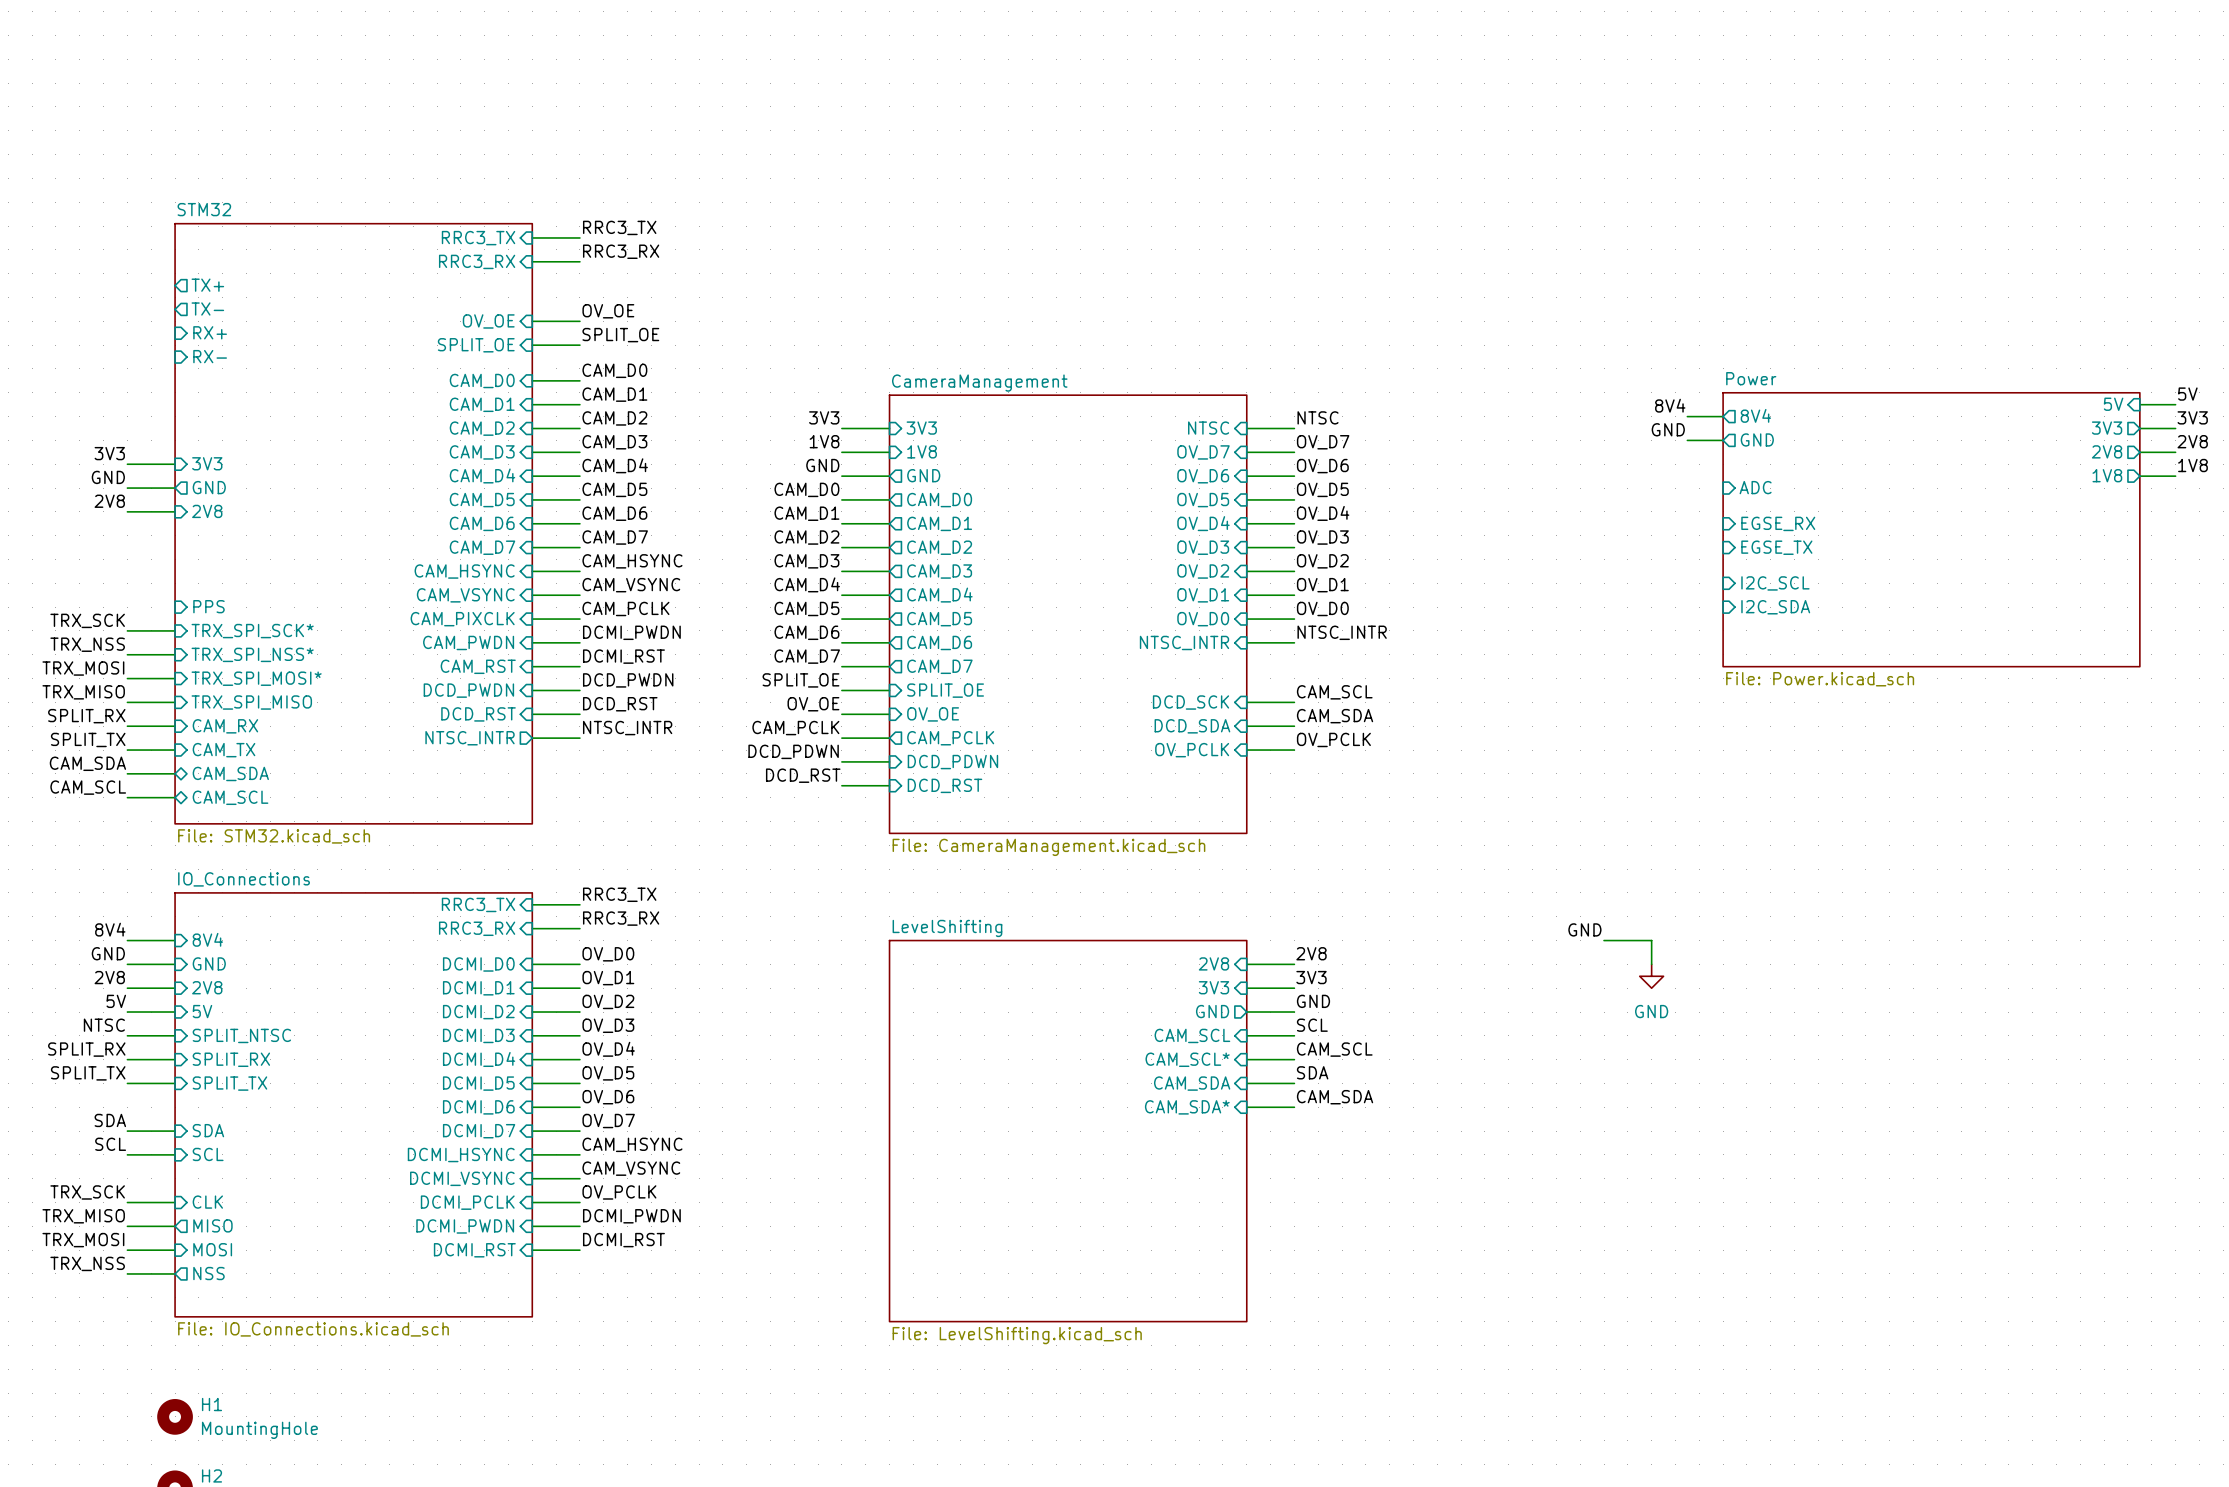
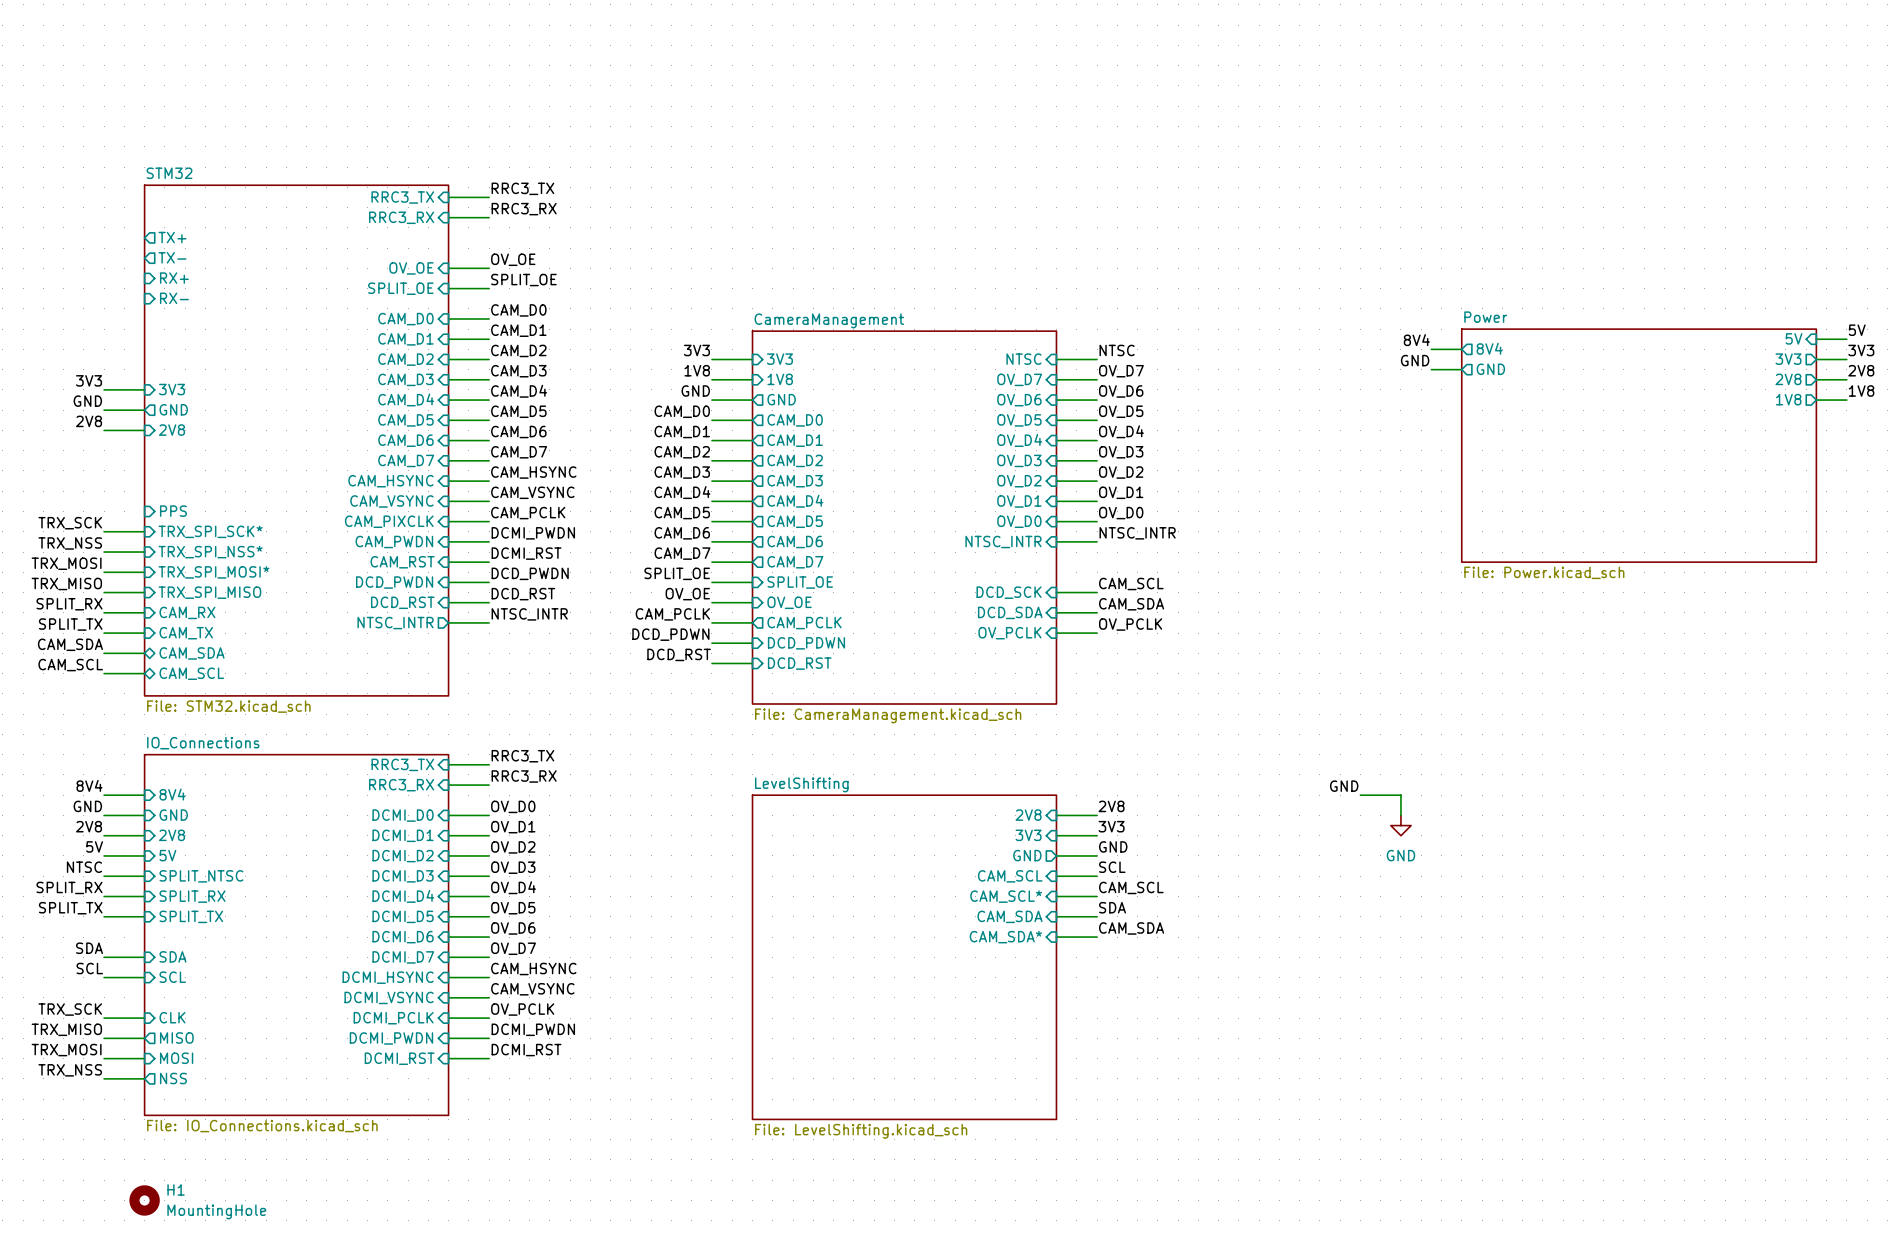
sheet pin: ADC (1755, 487) -> none
sheet pin: EGSE_RX (1778, 523) -> none
sheet pin: EGSE_TX (1776, 547) -> none
sheet pin: I2C_SCL (1775, 583) -> none
sheet pin: I2C_SDA (1775, 607) -> none

